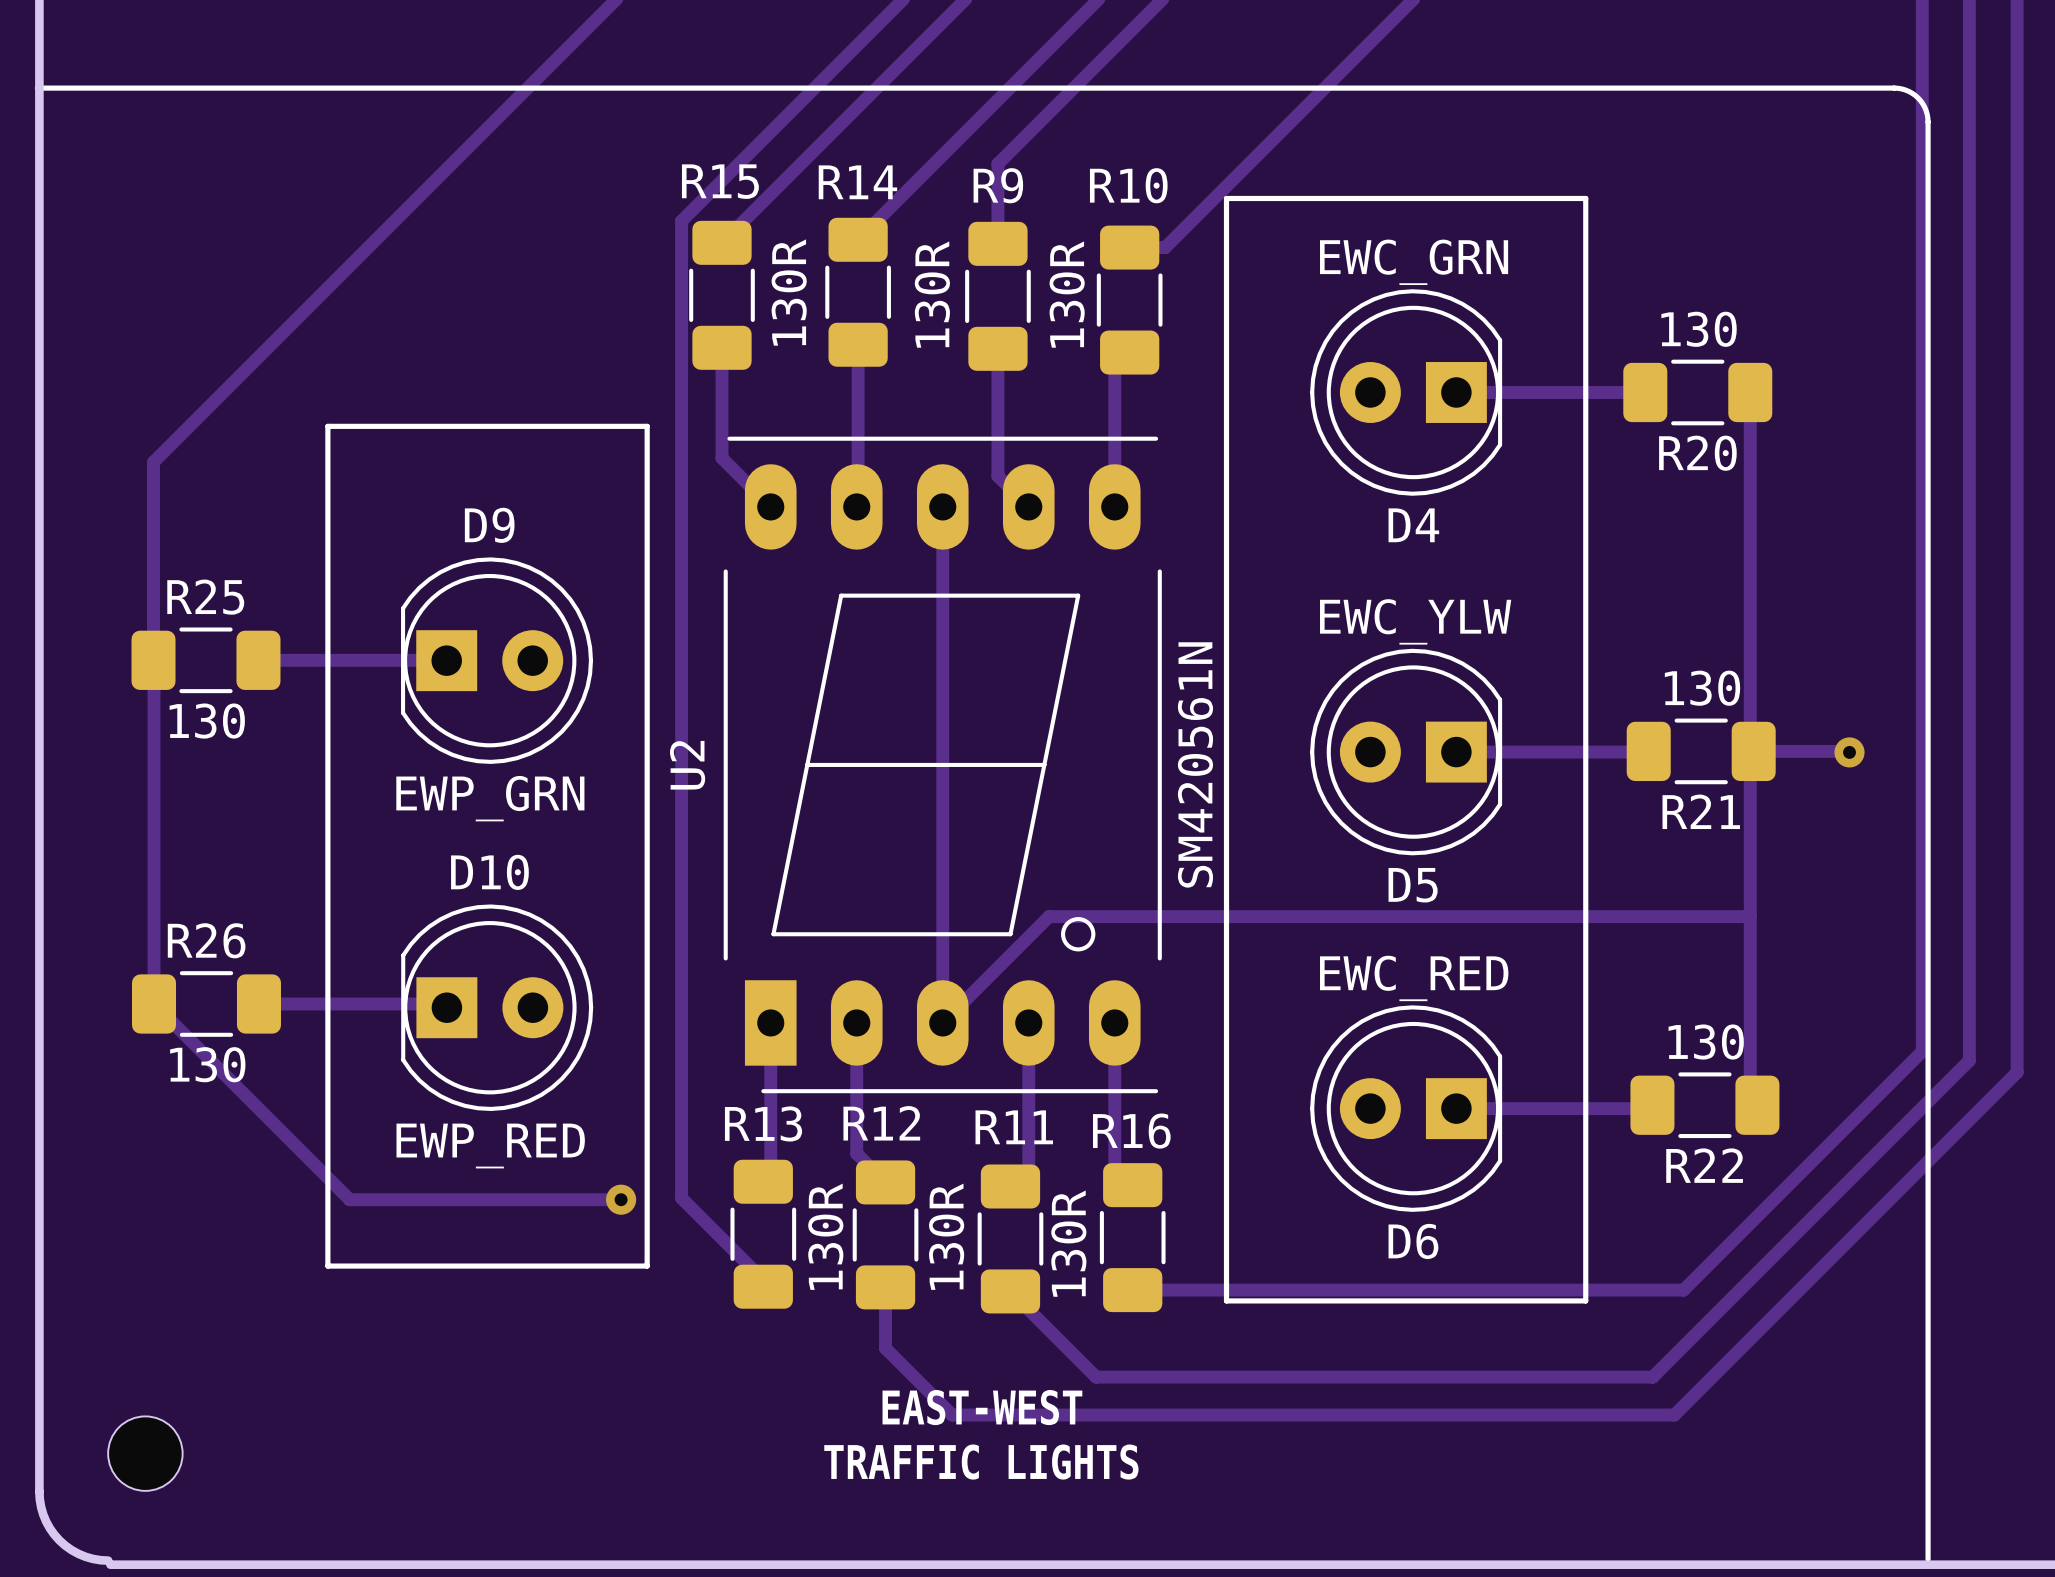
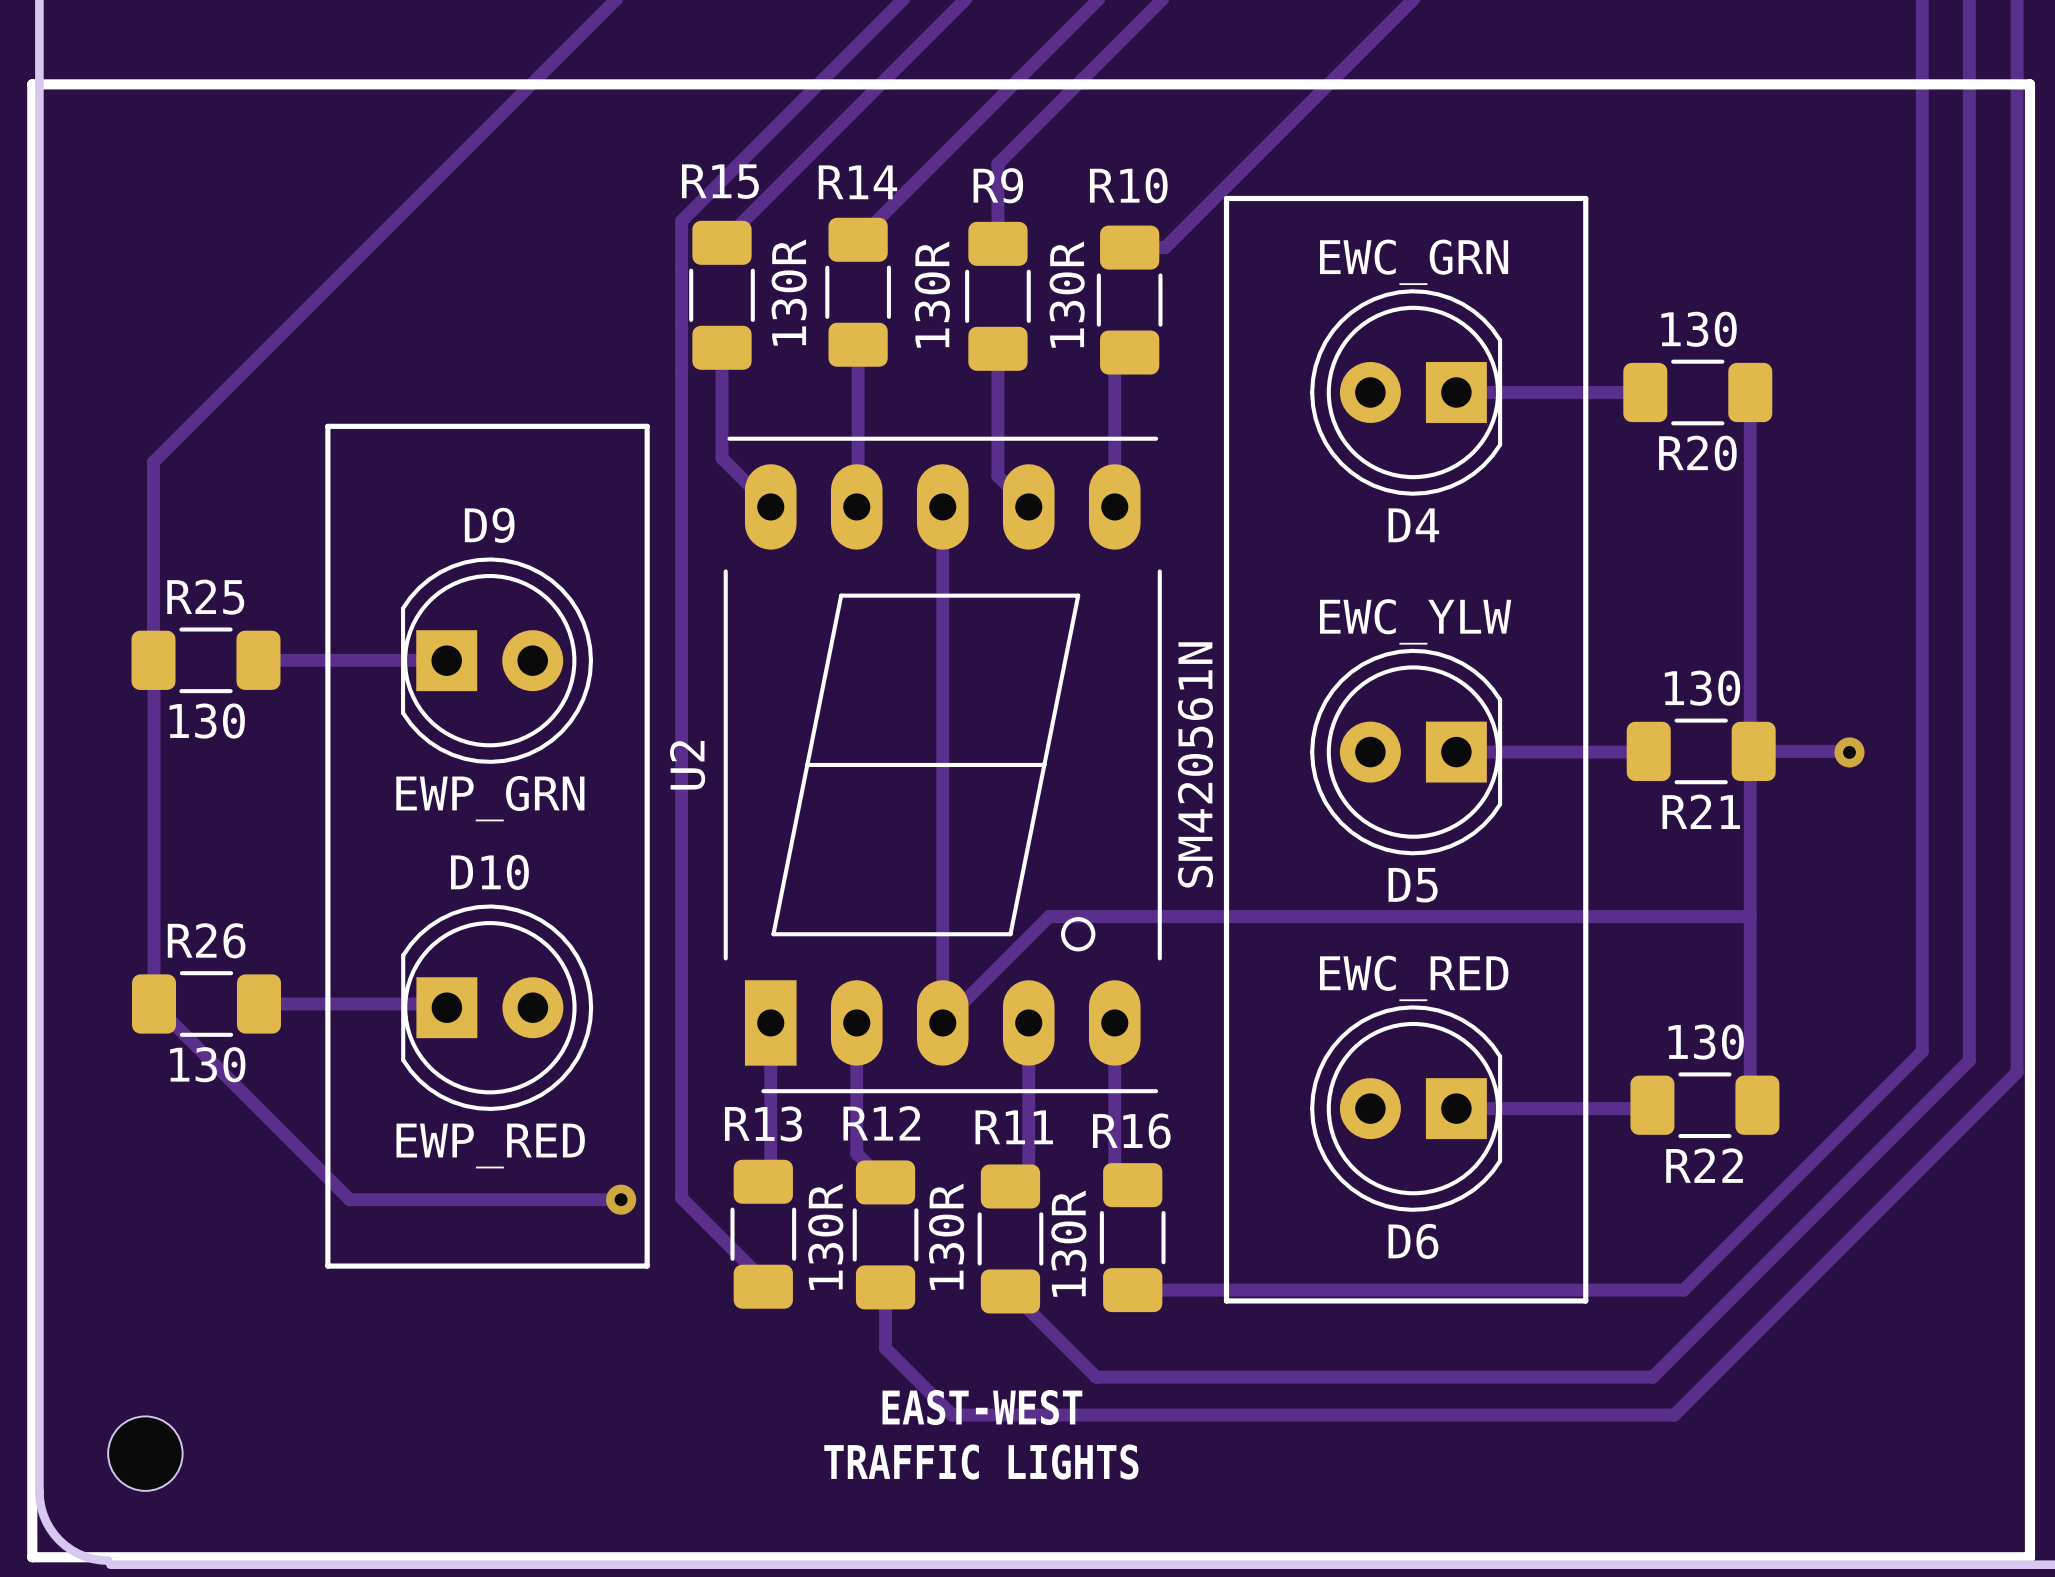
line: none -> (32, 84) (32, 1557) (2029, 1557) (2029, 84) (32, 84)
line: (37, 88) (1894, 88) (1905, 90) (1915, 95) (1924, 107) (1928, 121) (1928, 1559) -> none

